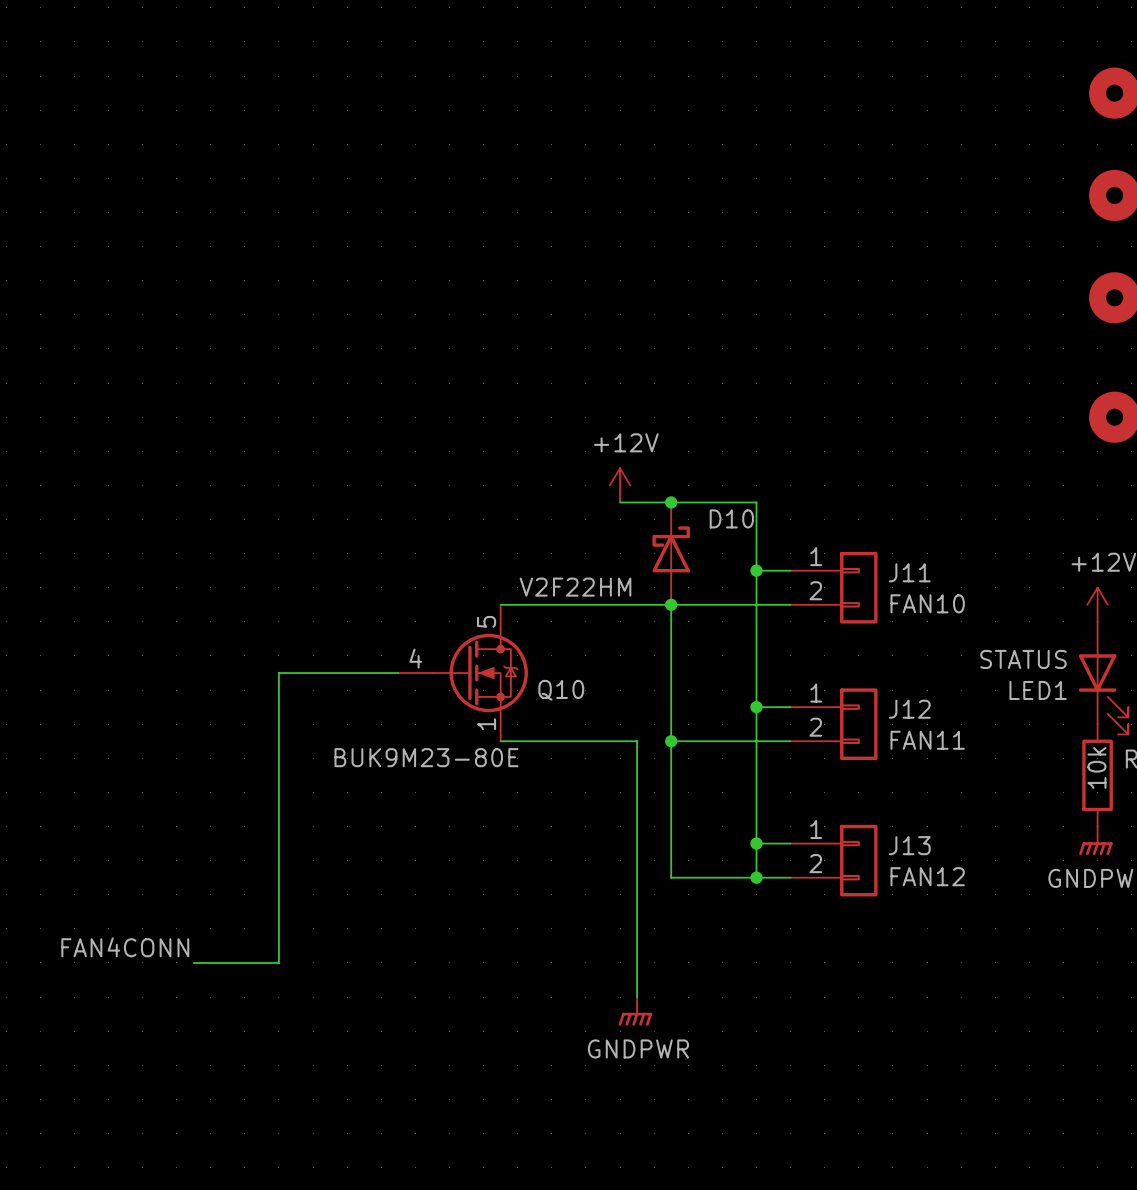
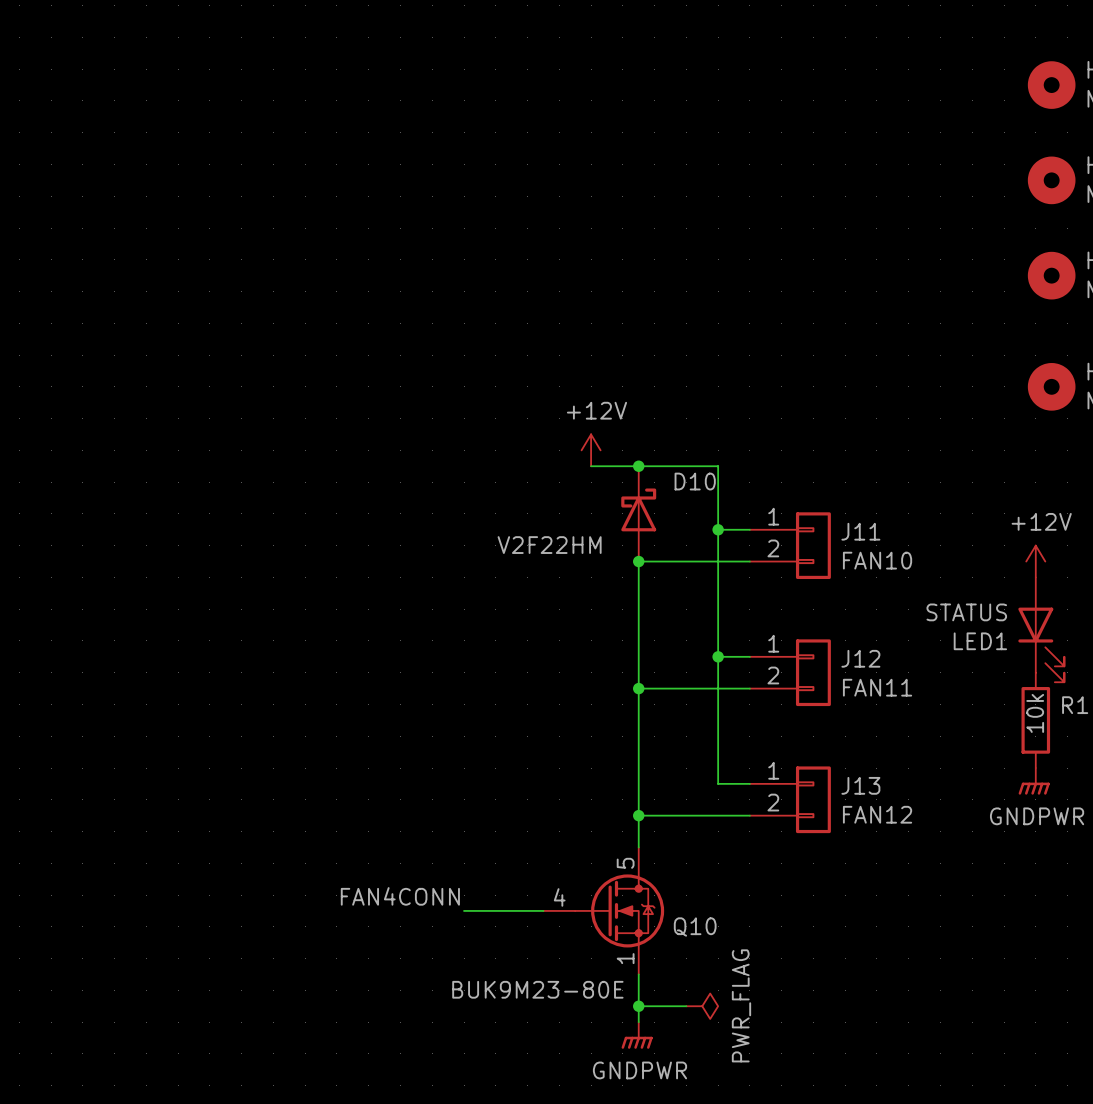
wire: (500, 604) (671, 604) -> none
wire: (398, 673) (278, 673) (278, 962) (193, 962) -> none
Q10 position: (463, 673) -> (603, 910)
wire: (500, 741) (637, 741) (637, 997) -> none
Q10 value position: BUK9M23-80E (426, 757) -> BUK9M23-80E (537, 989)
wire: (756, 843) (756, 877) -> (638, 815) (638, 847)
junction: (756, 843) -> none
junction: none -> (638, 815)
junction: (756, 877) -> none
label position: FAN4CONN (125, 947) -> FAN4CONN (400, 896)
wire: none -> (464, 910) (543, 910)
power symbol position: GNDPWR (635, 1011) -> GNDPWR (637, 1035)
wire: none -> (638, 974) (638, 1022)
wire: none -> (638, 1006) (686, 1006)
junction: none -> (638, 1006)
power symbol: none -> PWR_FLAG (702, 1006)

